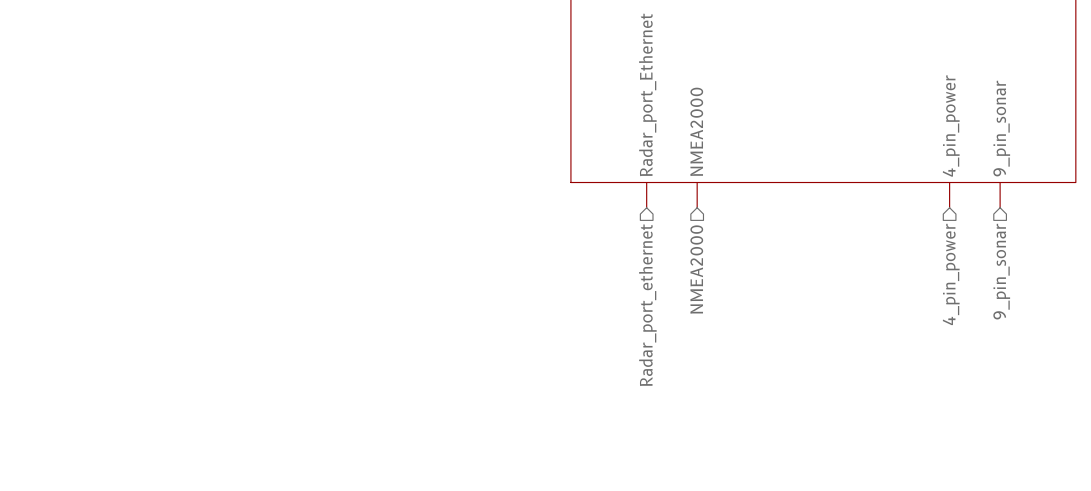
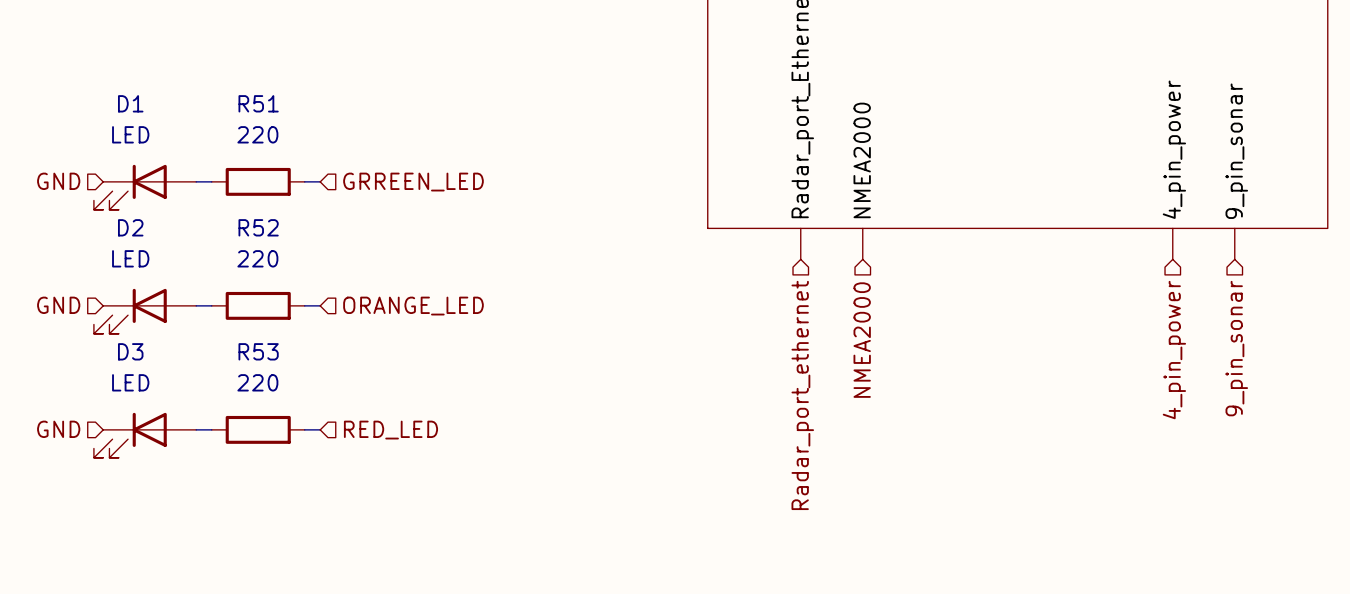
hierarchical label: none -> GND (58, 181)
wire: none -> (196, 181) (211, 181)
R51: none -> 220 (258, 181)
wire: none -> (304, 181) (320, 181)
hierarchical label: none -> GRREEN_LED (413, 182)
D1: none -> LED (145, 187)
hierarchical label: none -> GND (58, 305)
wire: none -> (196, 305) (211, 305)
R52: none -> 220 (258, 305)
wire: none -> (304, 305) (320, 305)
hierarchical label: none -> ORANGE_LED (413, 306)
D2: none -> LED (145, 311)
hierarchical label: none -> GND (58, 429)
wire: none -> (196, 429) (211, 429)
R53: none -> 220 (258, 429)
wire: none -> (304, 429) (320, 429)
hierarchical label: none -> RED_LED (390, 430)
D3: none -> LED (145, 435)

